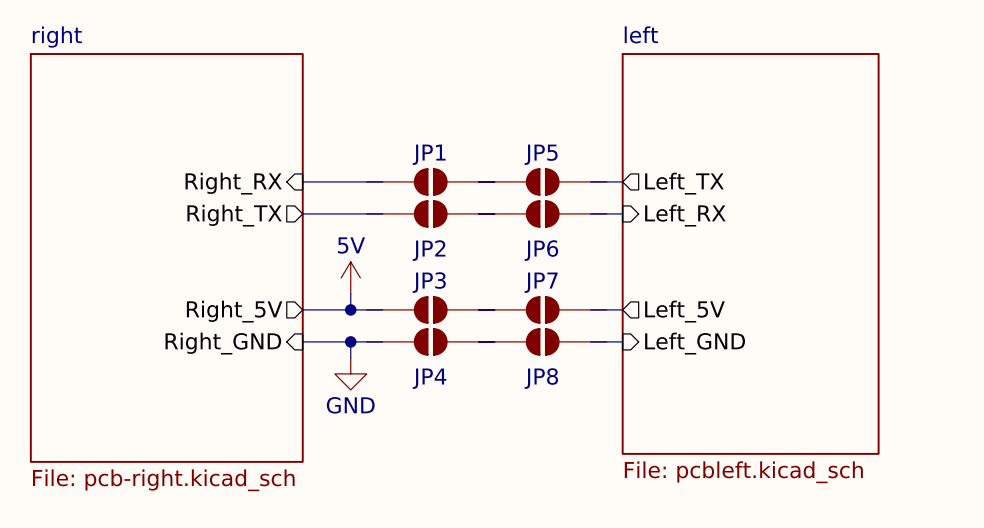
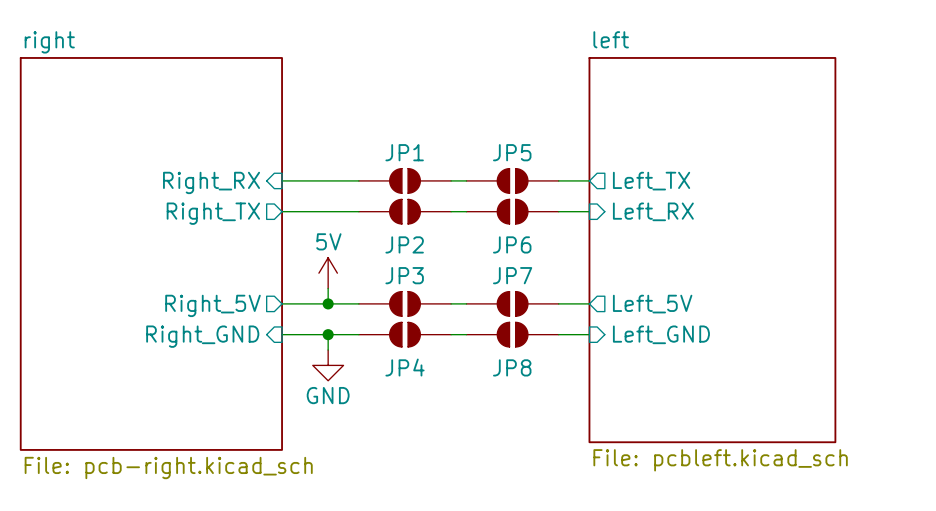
JP1 symbol: [366, 168, 495, 196] -> [358, 168, 452, 194]
JP5 symbol: [478, 168, 607, 196] -> [466, 168, 559, 194]
JP2 symbol: [366, 200, 495, 228] -> [358, 199, 452, 224]
JP6 symbol: [478, 200, 607, 228] -> [466, 199, 559, 224]
JP3 symbol: [366, 296, 495, 324] -> [358, 291, 452, 317]
JP7 symbol: [478, 296, 607, 324] -> [466, 291, 559, 317]
JP4 symbol: [366, 328, 495, 356] -> [358, 322, 452, 347]
JP8 symbol: [478, 328, 607, 356] -> [466, 322, 559, 347]

